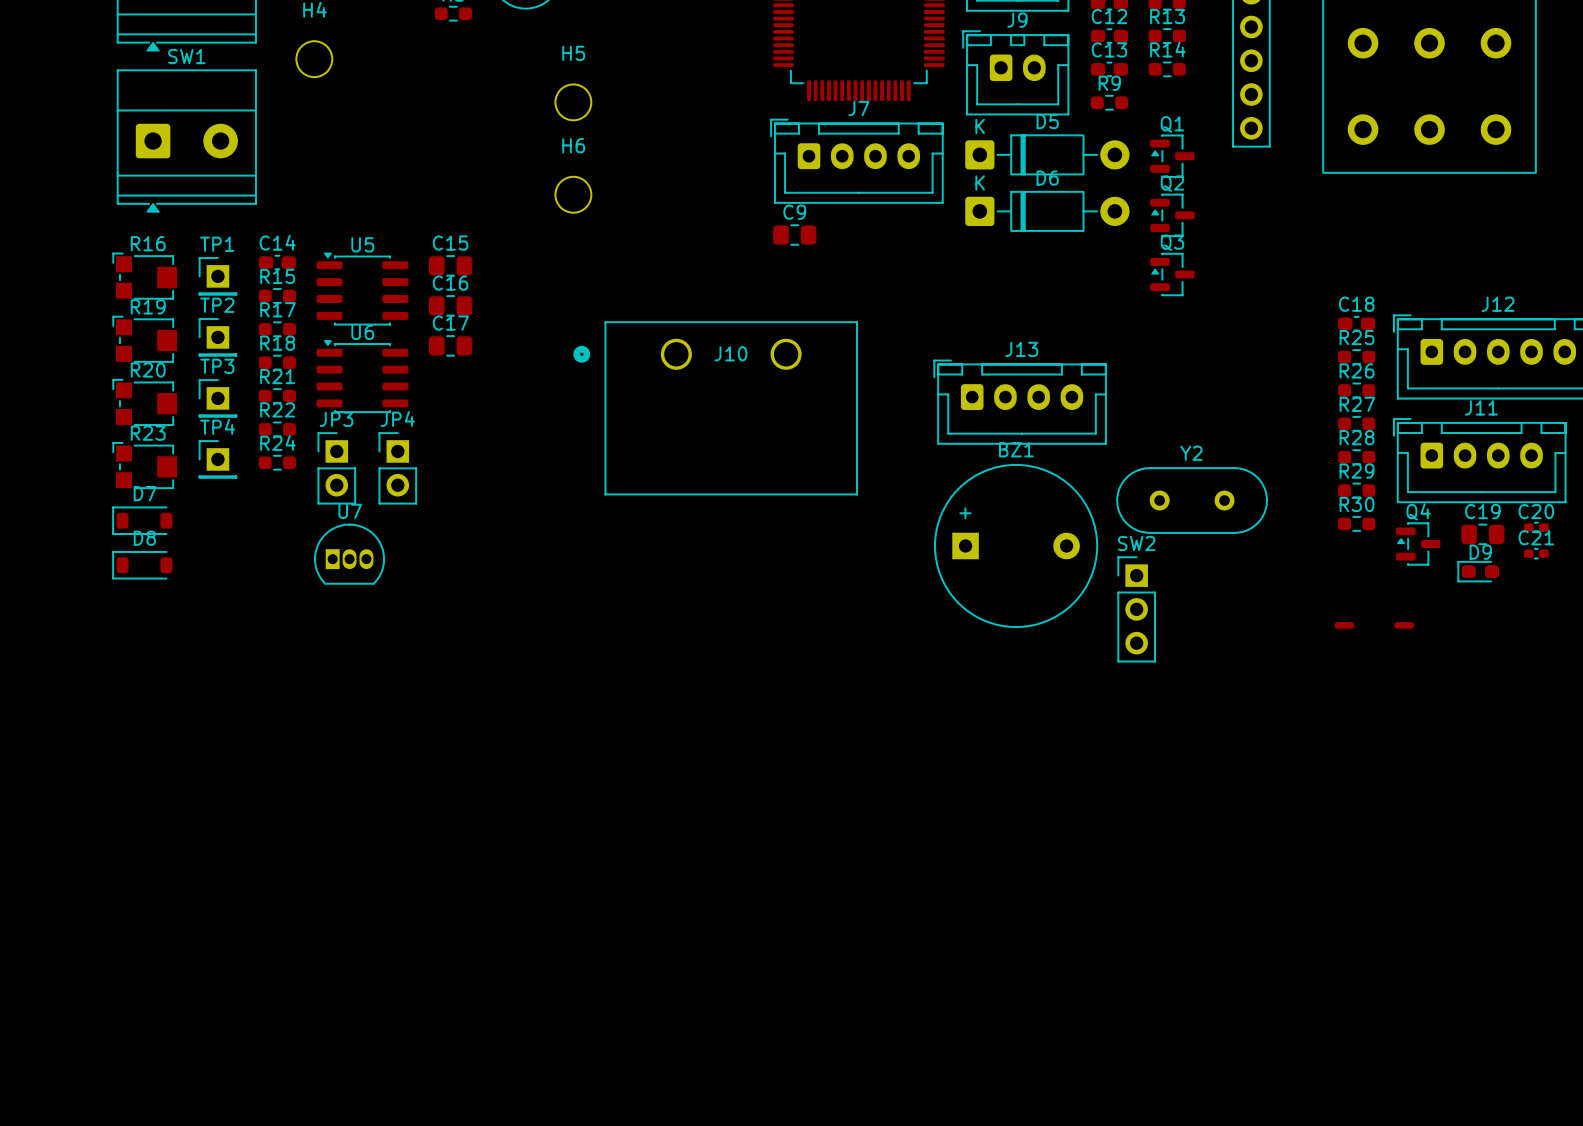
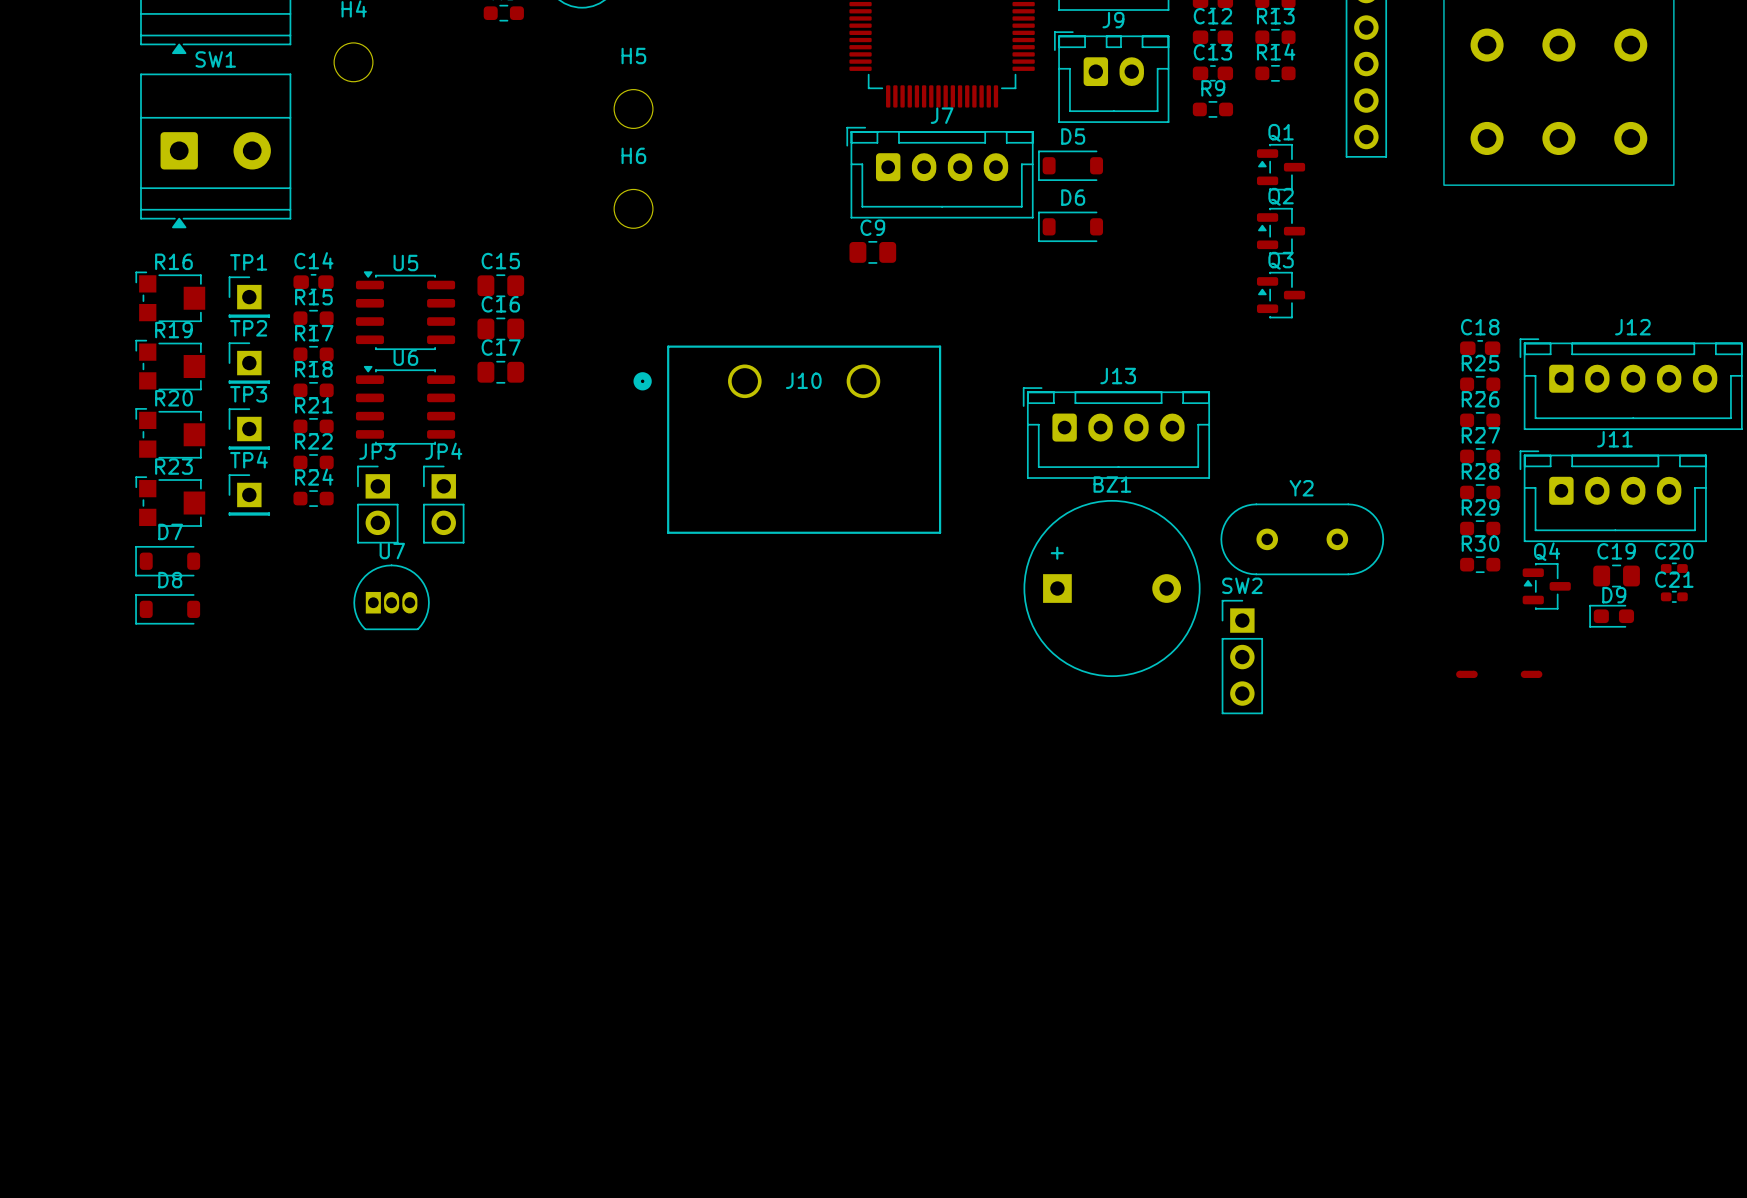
D5 footprint: [965, 134, 1130, 176] -> [1038, 150, 1104, 181]
D6 footprint: [965, 191, 1130, 232] -> [1038, 211, 1104, 243]

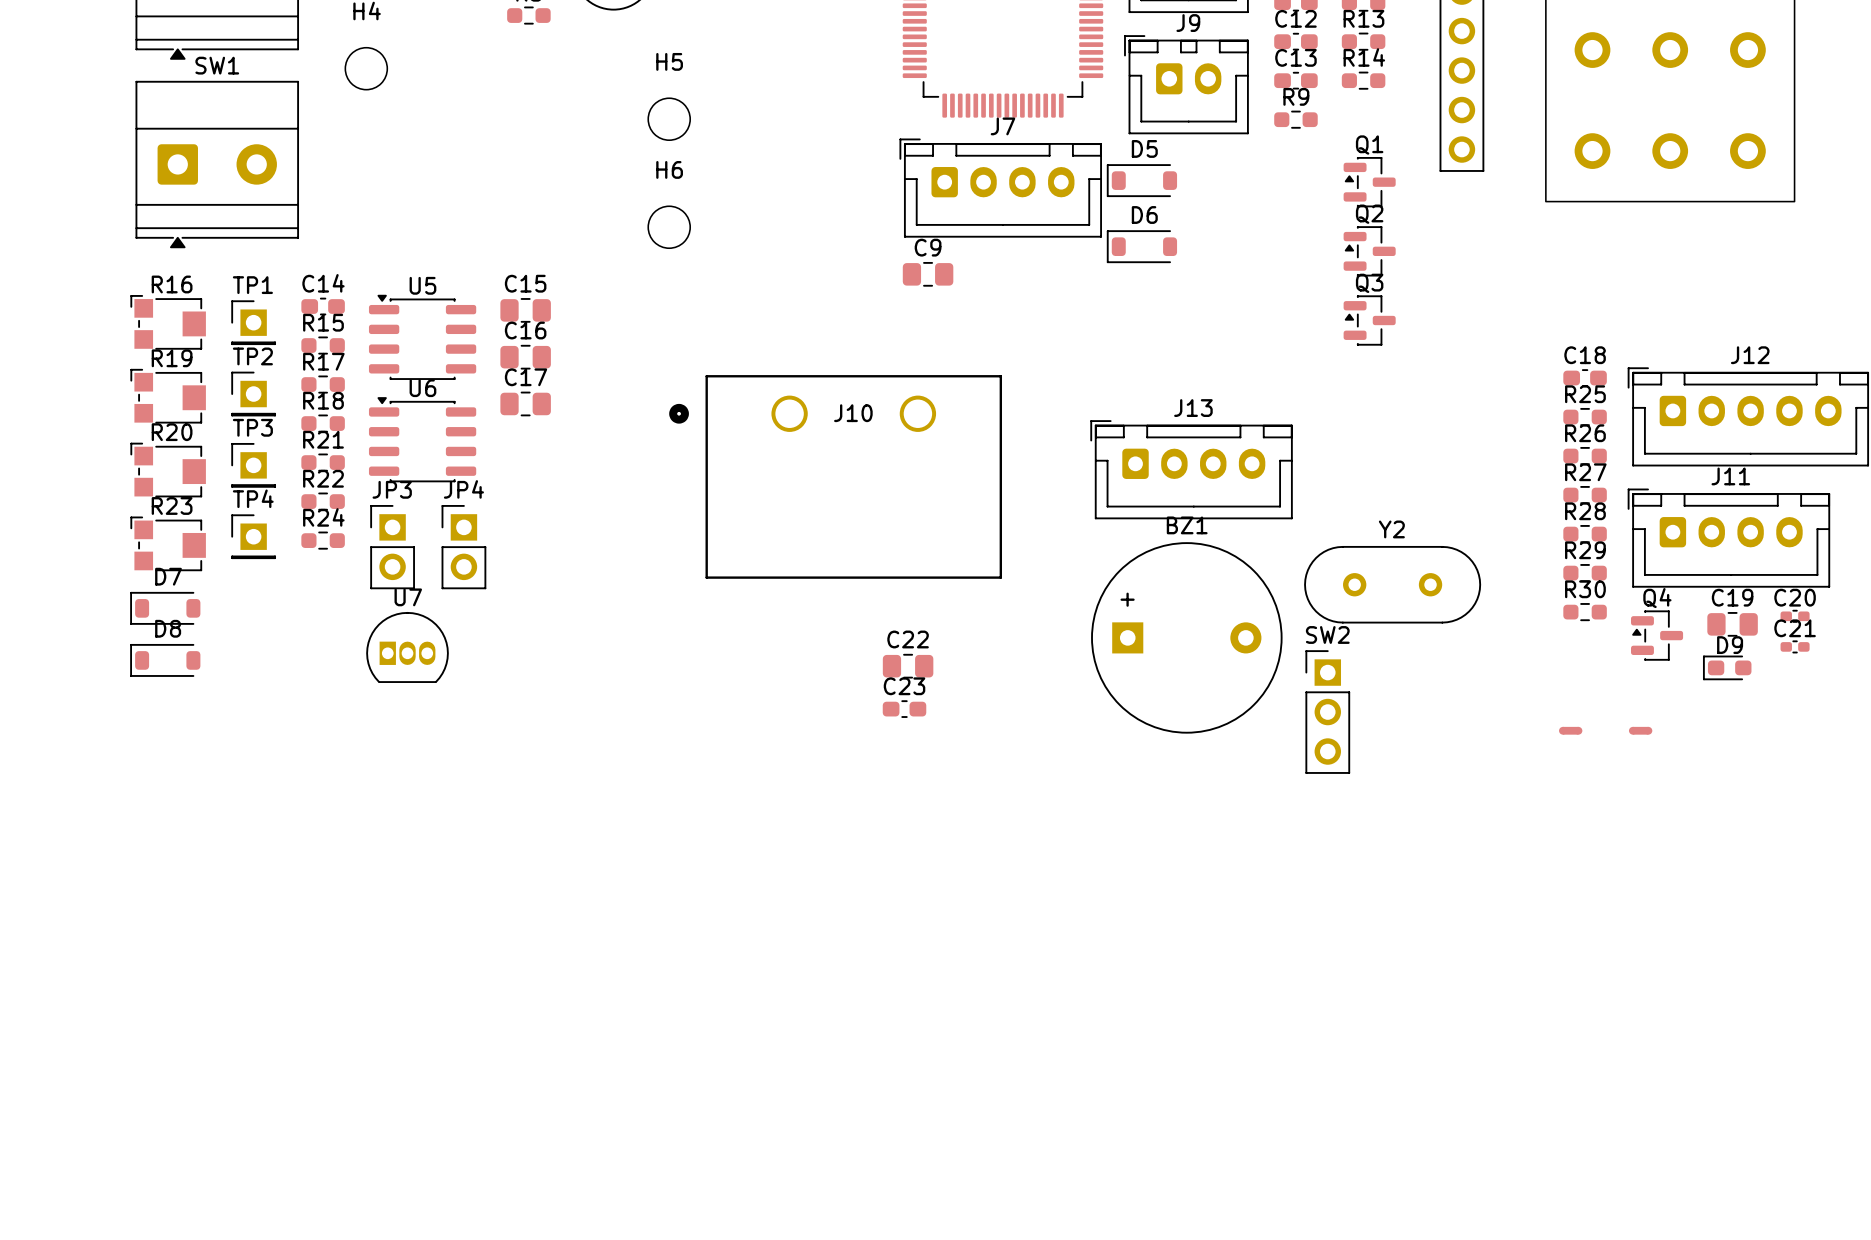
C22: none -> (908, 666)
C23: none -> (904, 709)

